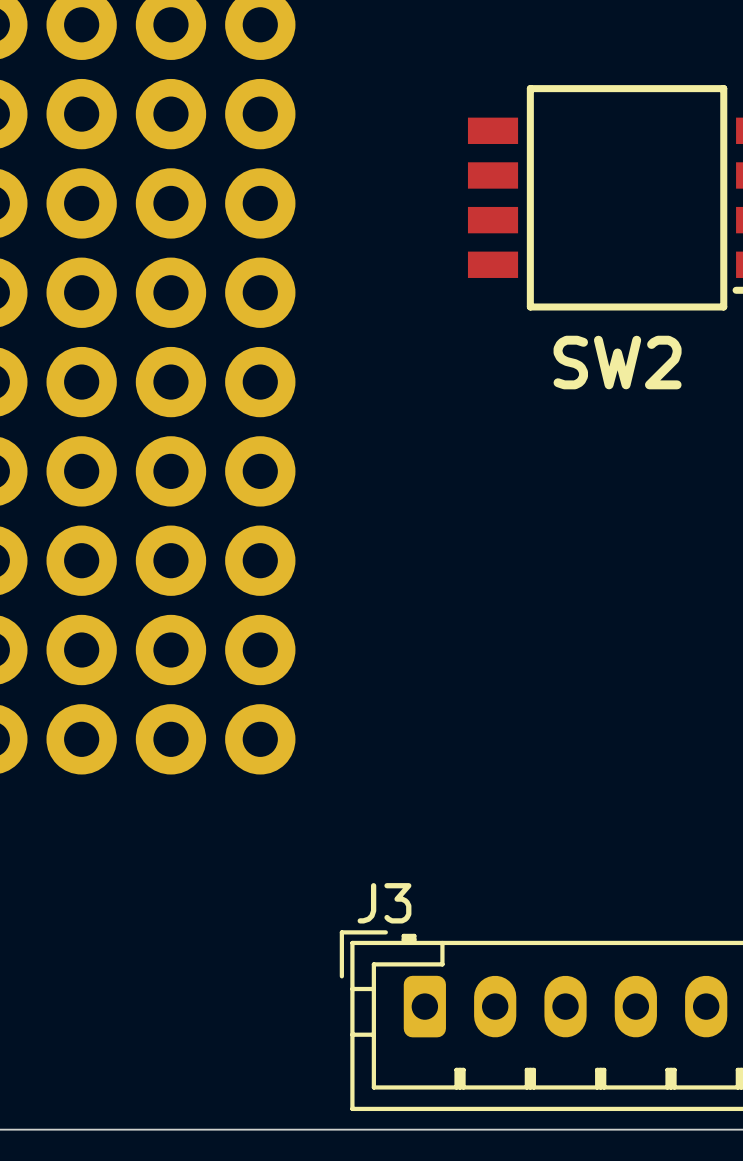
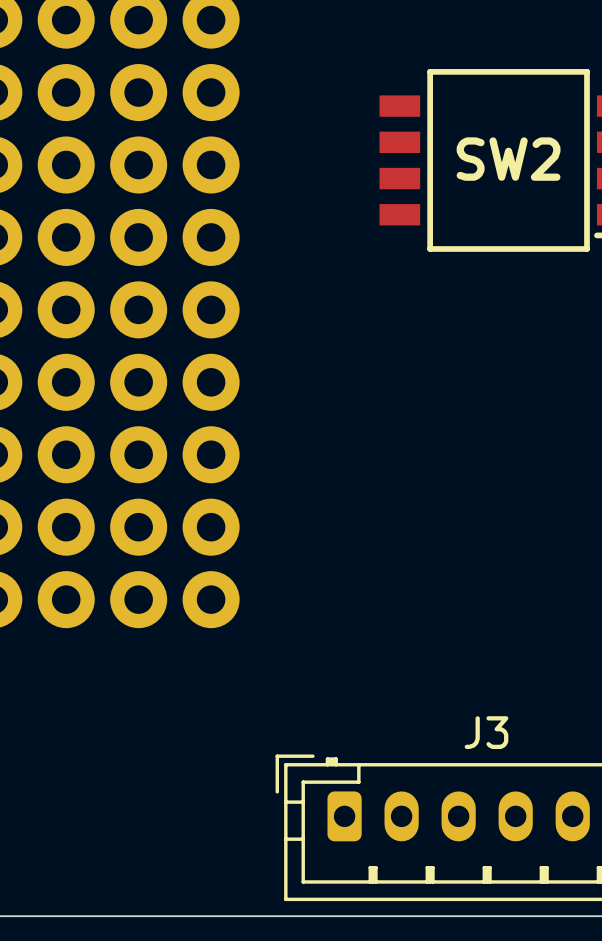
SW2 name position: SW2 (617, 362) -> SW2 (508, 159)
J3 name position: J3 (384, 903) -> J3 (486, 732)

